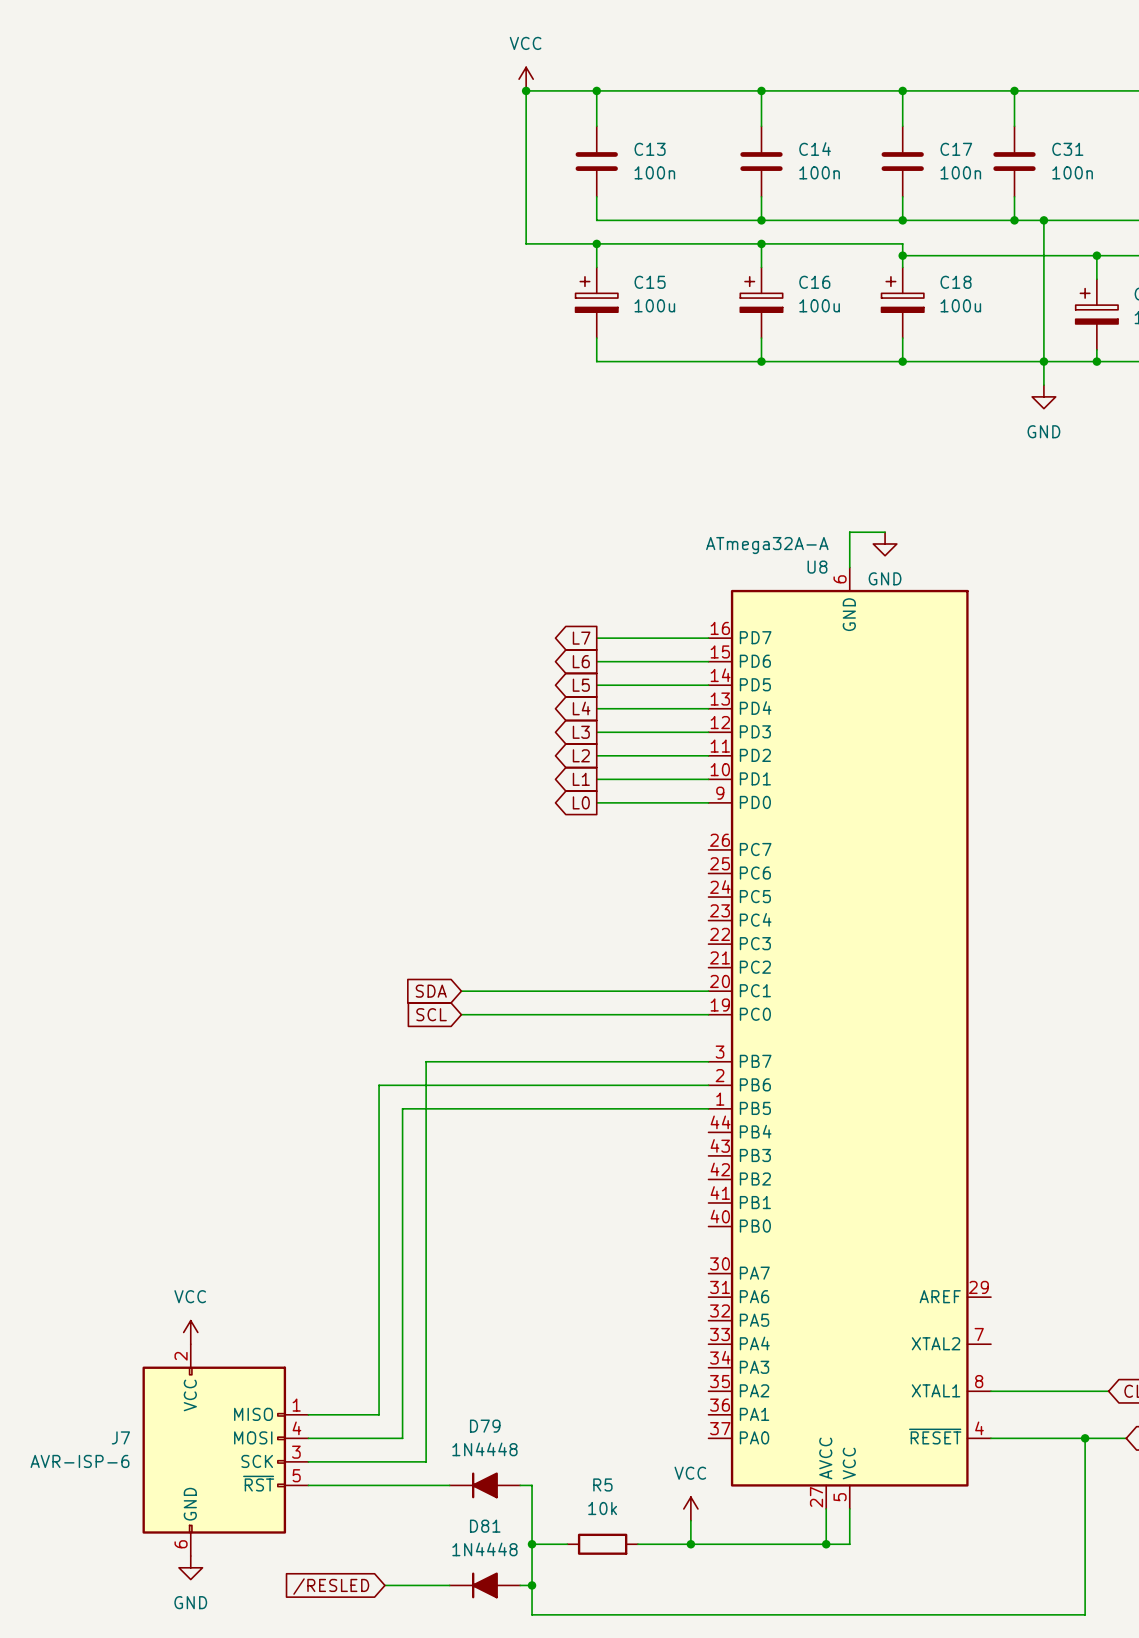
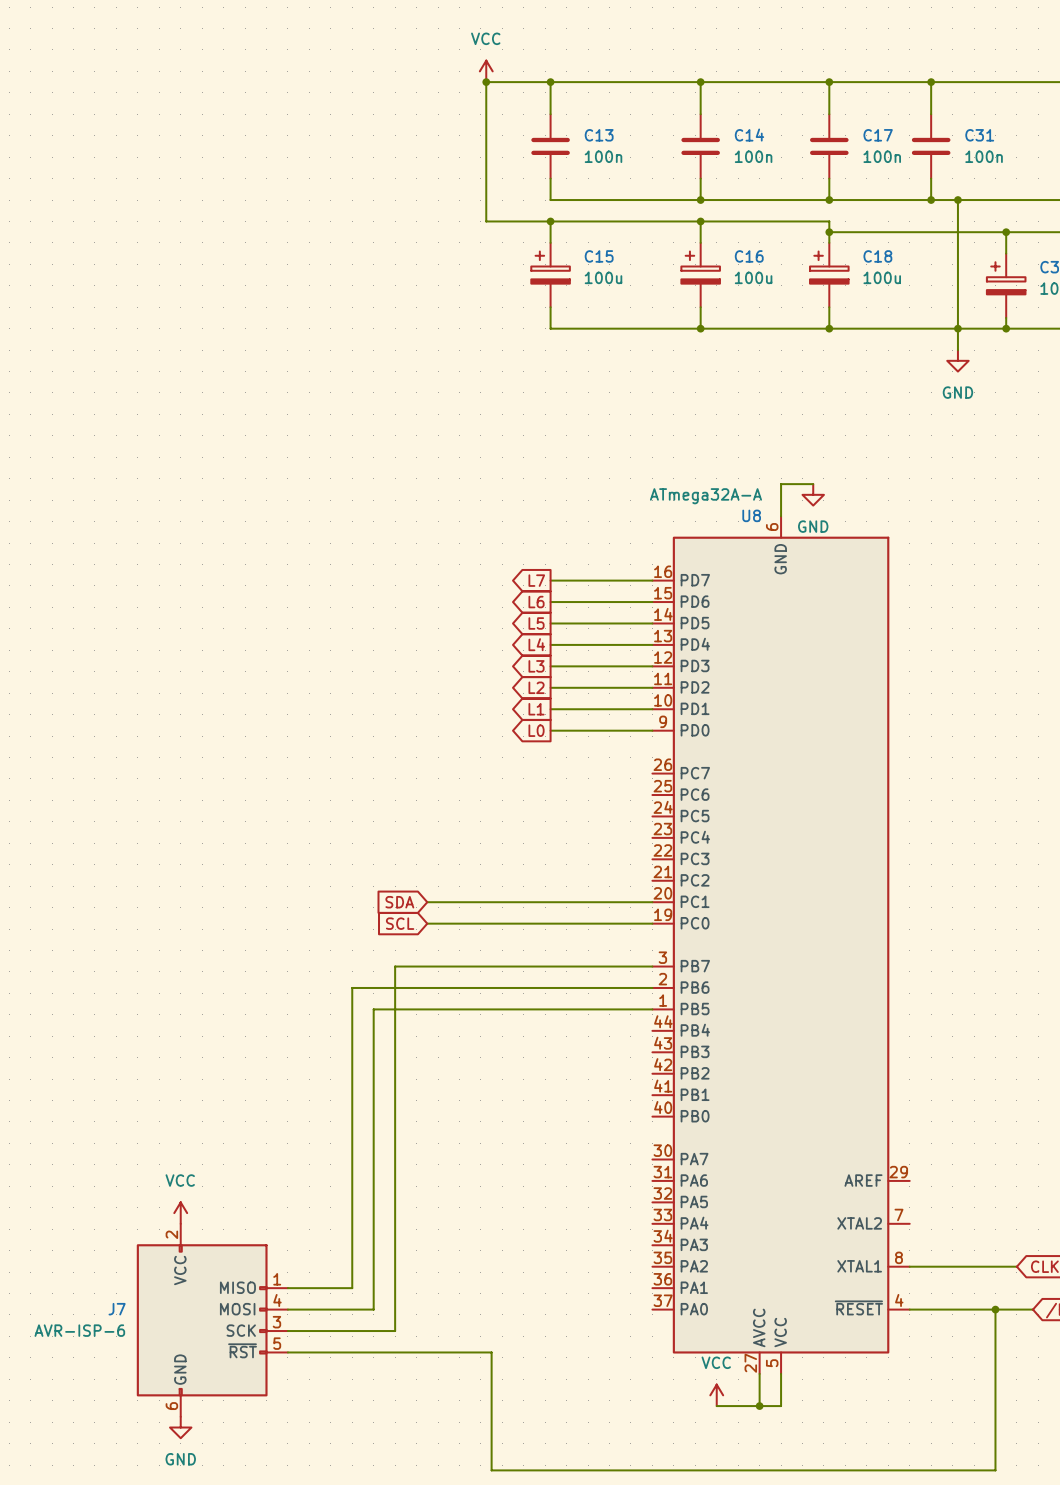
D79: 1N4448 (484, 1485) -> none
power symbol position: VCC (690, 1508) -> VCC (716, 1395)
wire: (690, 1520) (690, 1544) -> none
wire: (532, 1544) (567, 1544) -> none
junction: (532, 1544) -> none
R5: 10k (602, 1544) -> none
wire: (637, 1544) (779, 1544) -> none
junction: (690, 1544) -> none
wire: (384, 1585) (449, 1585) -> none
D81: 1N4448 (484, 1585) -> none
wire: (520, 1585) (532, 1585) -> none
junction: (532, 1585) -> none
global label: /RESLED (331, 1586) -> none

